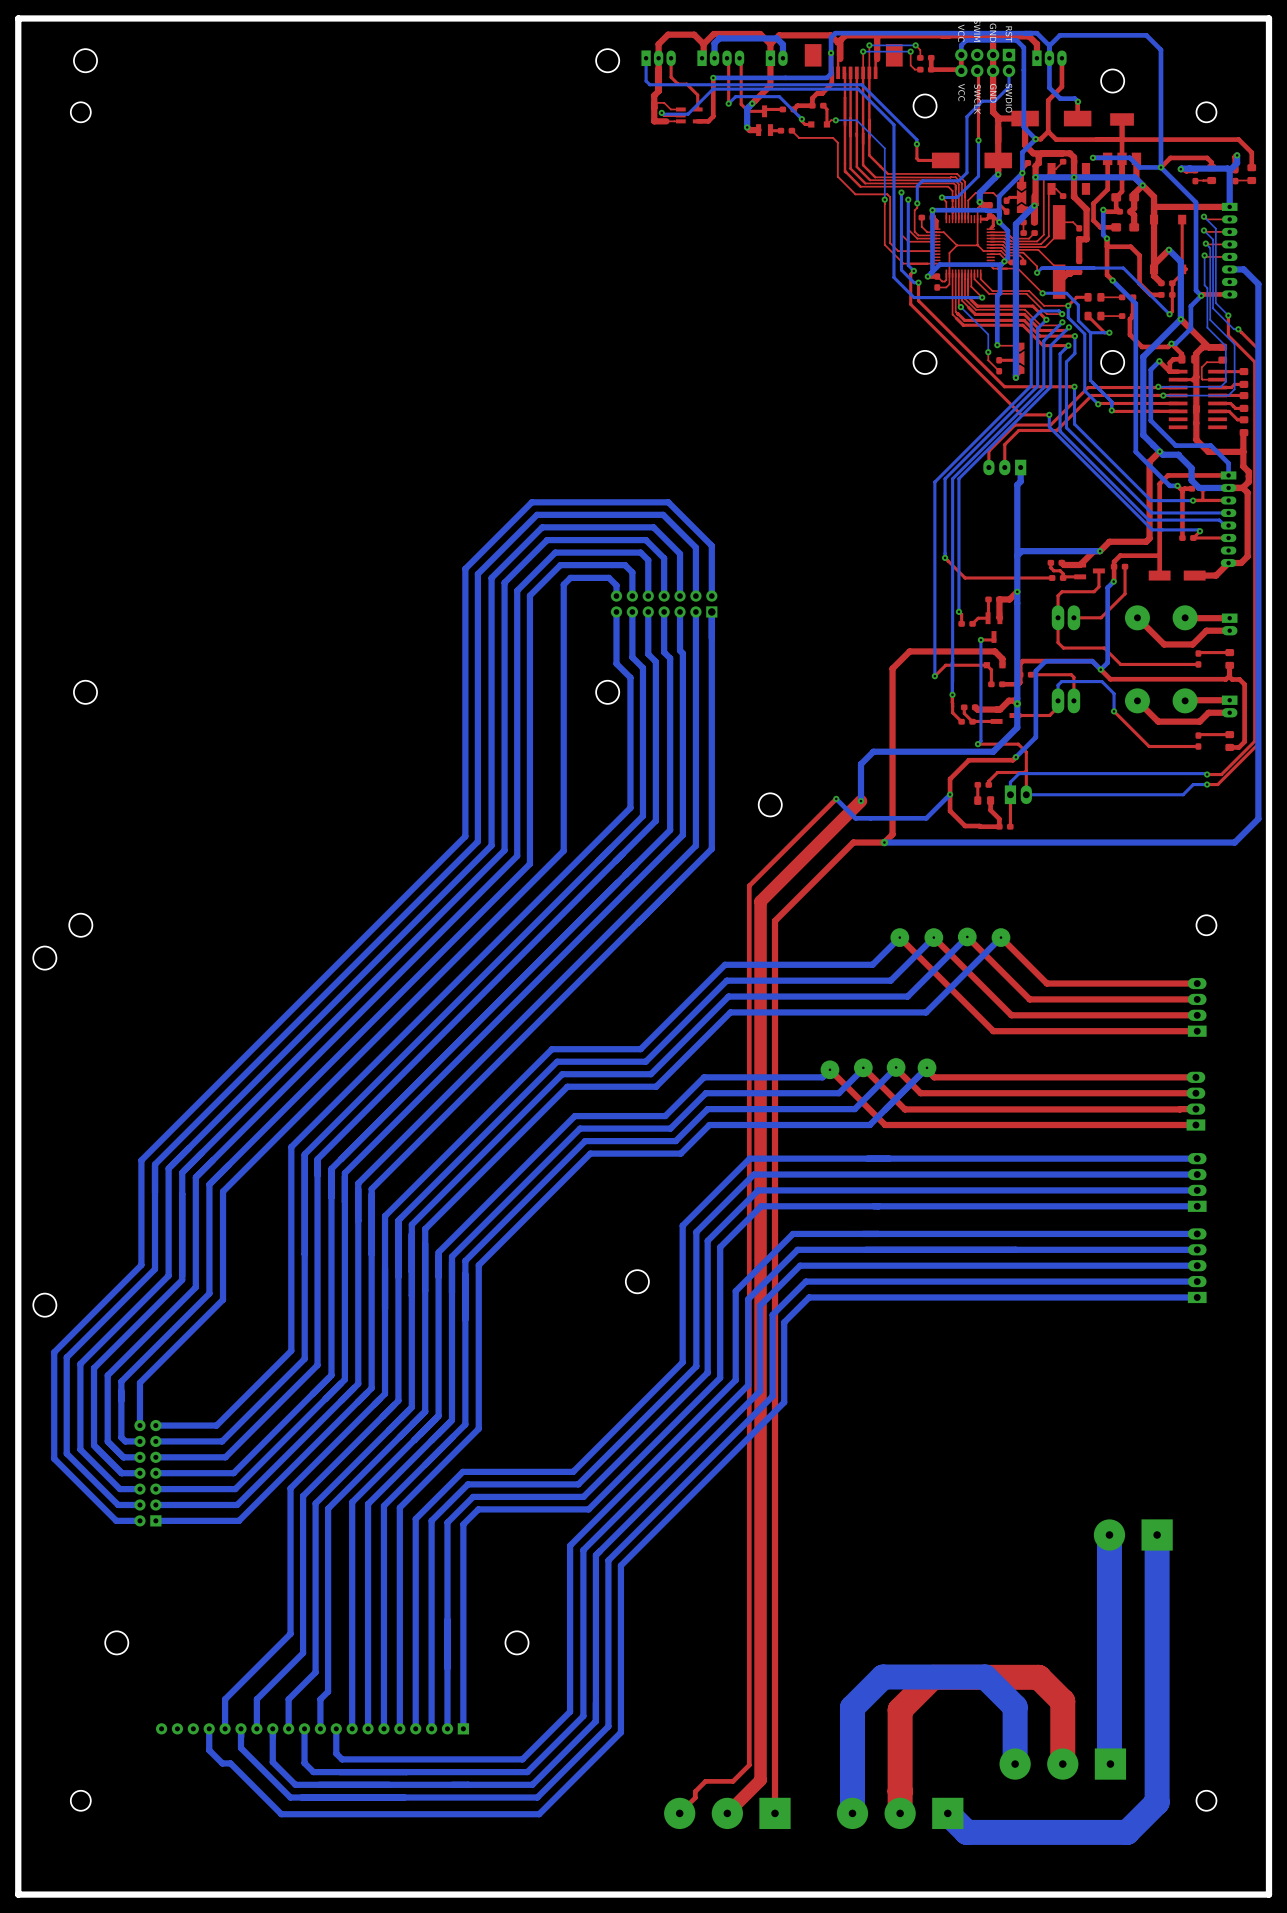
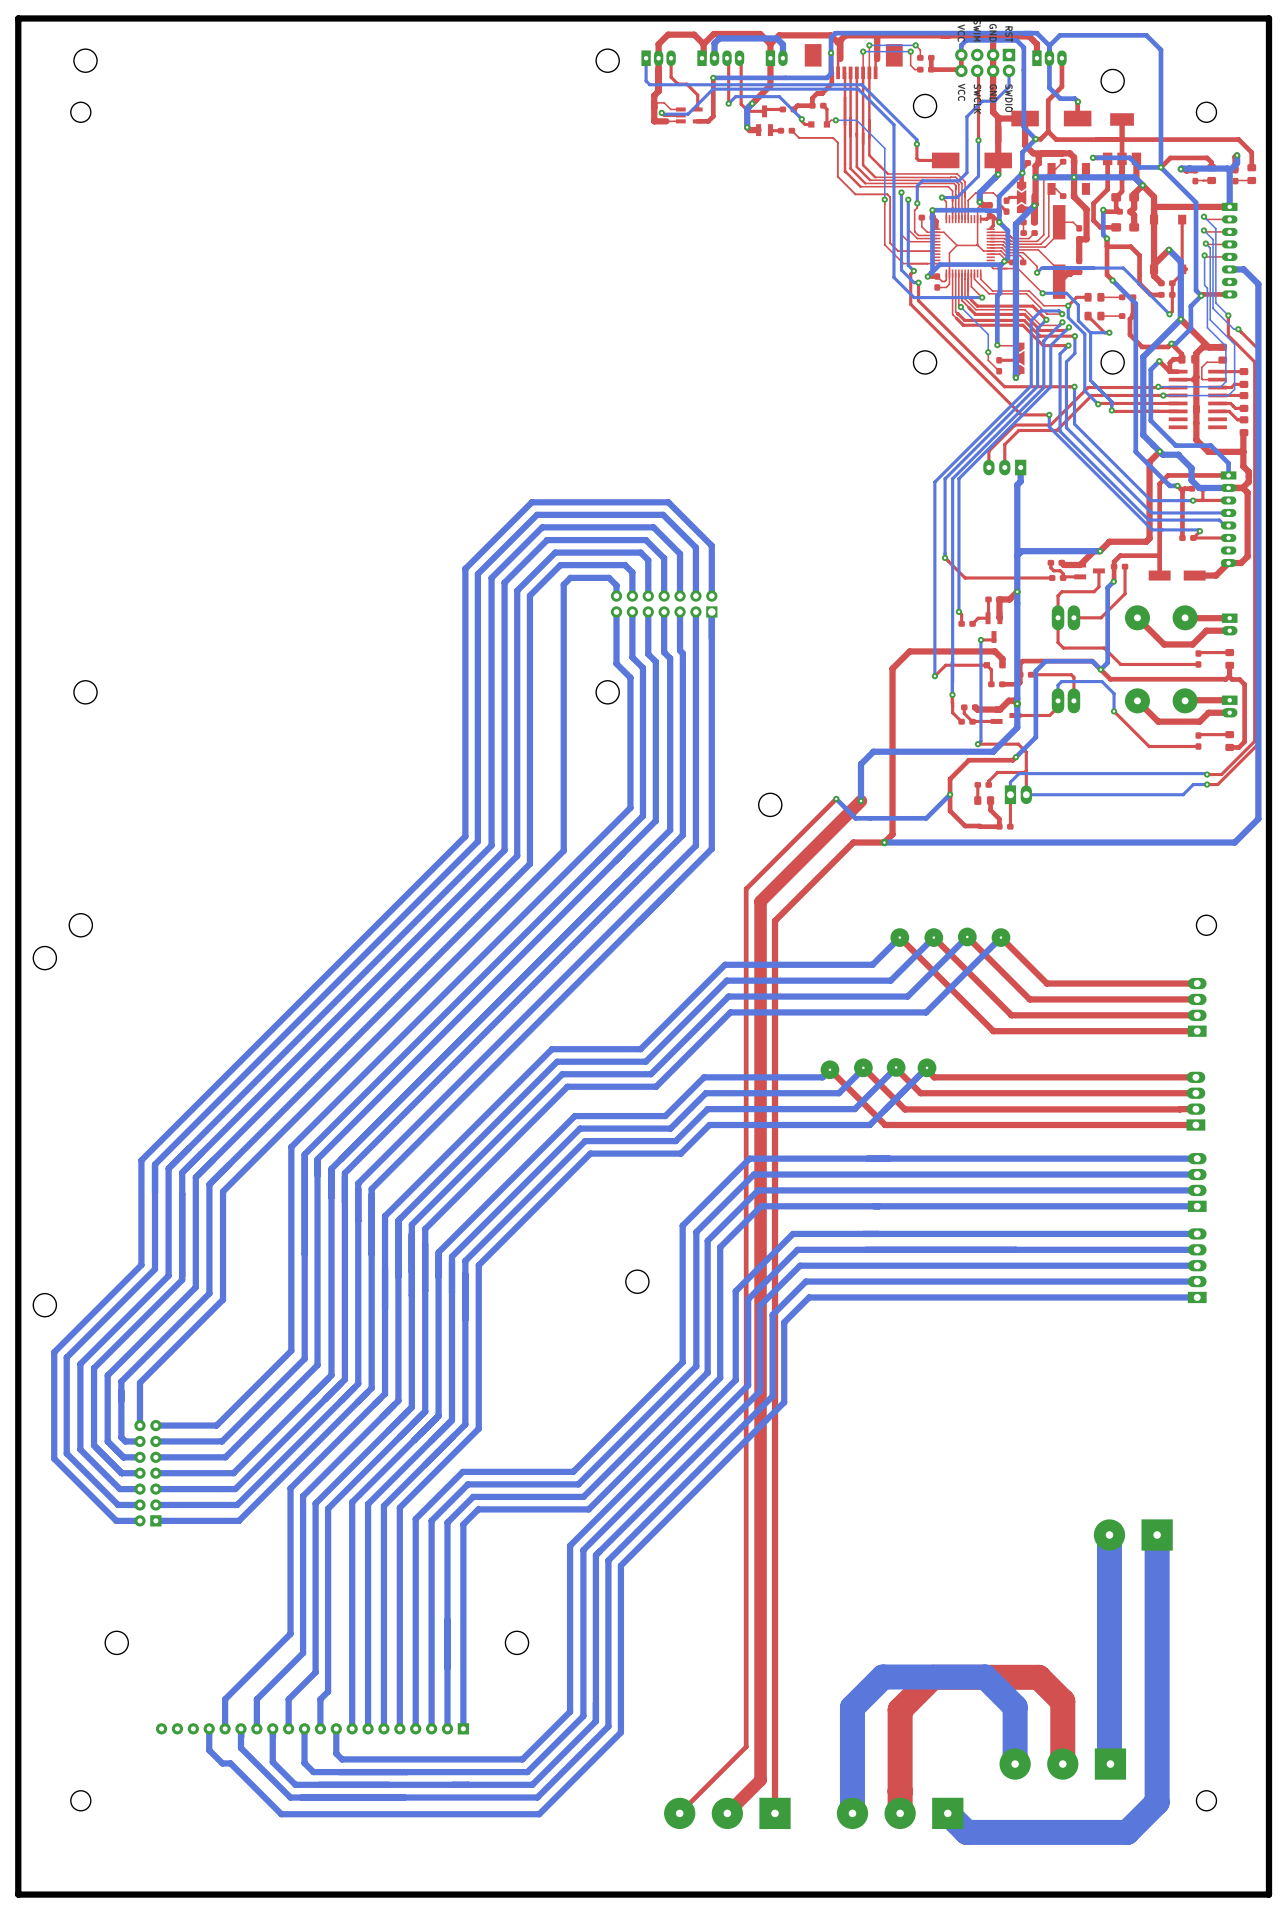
top track: (749, 885) (749, 1765) (733, 1781) (705, 1781) (695, 1791) (695, 1797) -> (749, 885) (746, 888) (746, 1746) (695, 1797)

